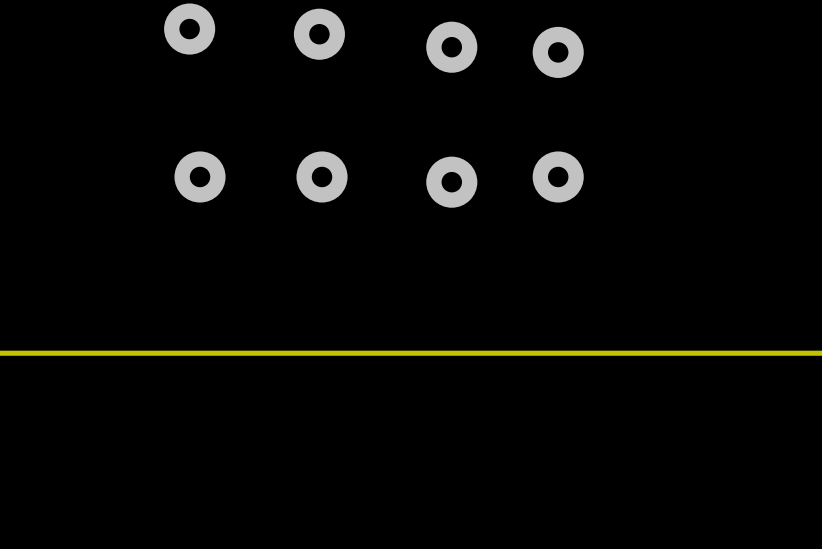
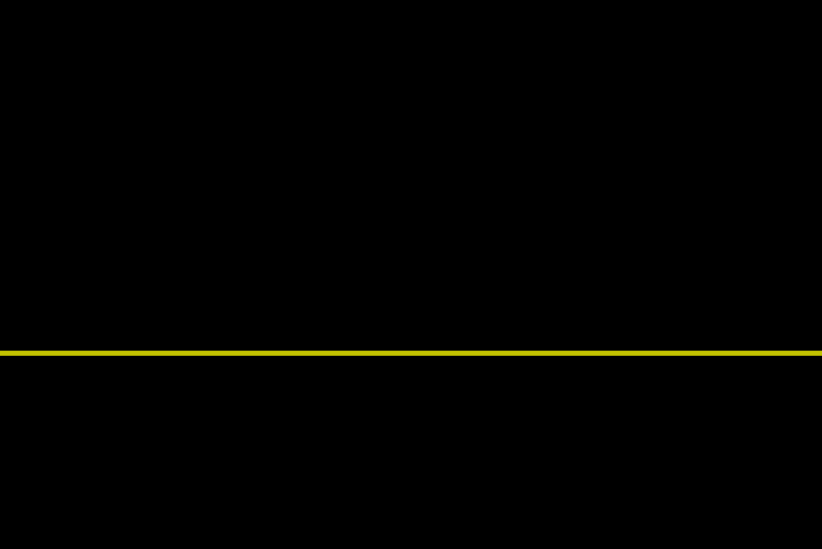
via: (189, 29) -> none
via: (319, 34) -> none
via: (451, 47) -> none
via: (558, 52) -> none
via: (200, 176) -> none
via: (322, 176) -> none
via: (558, 176) -> none
via: (451, 182) -> none

